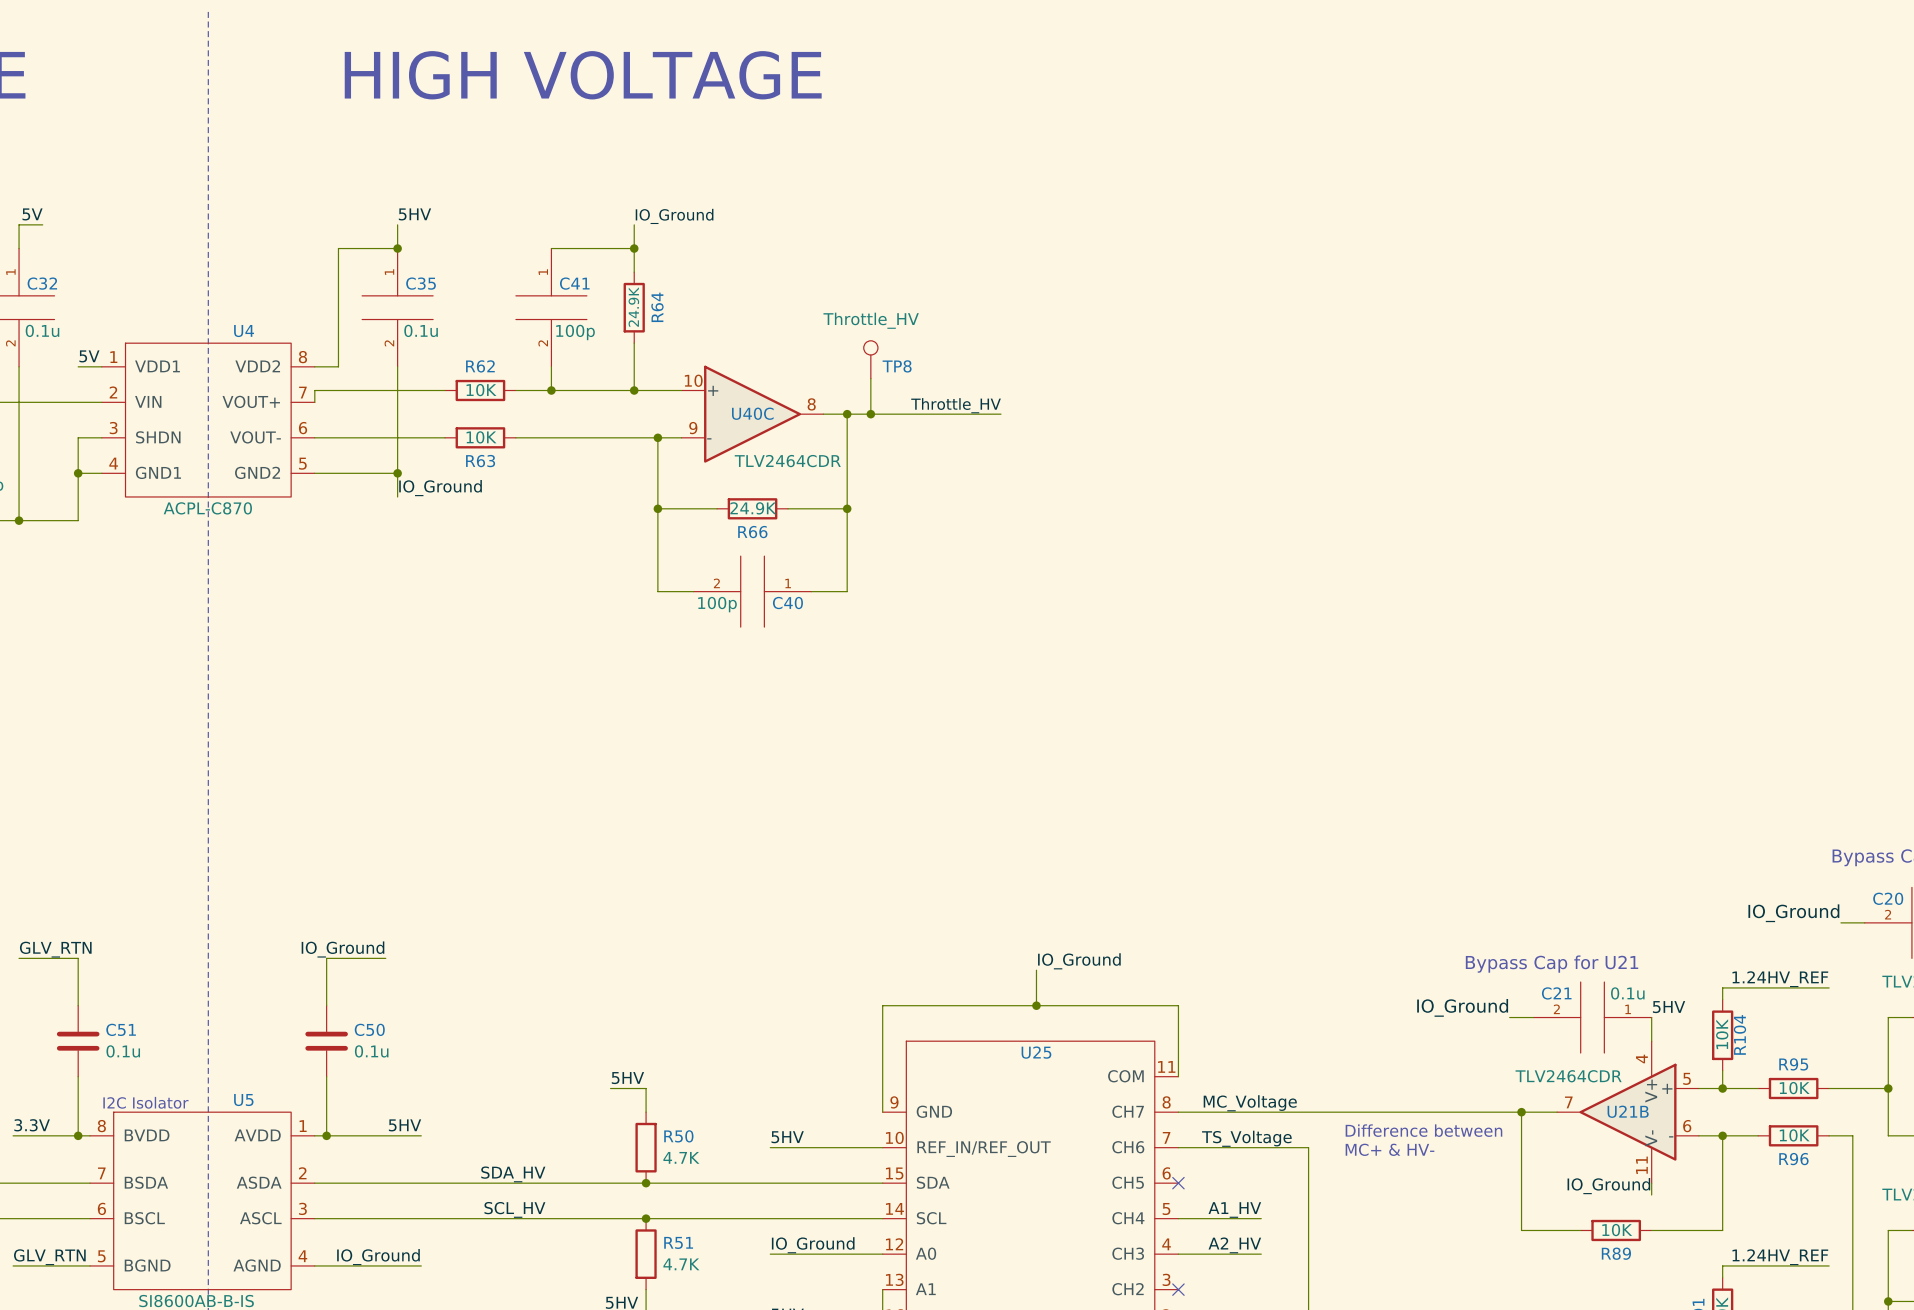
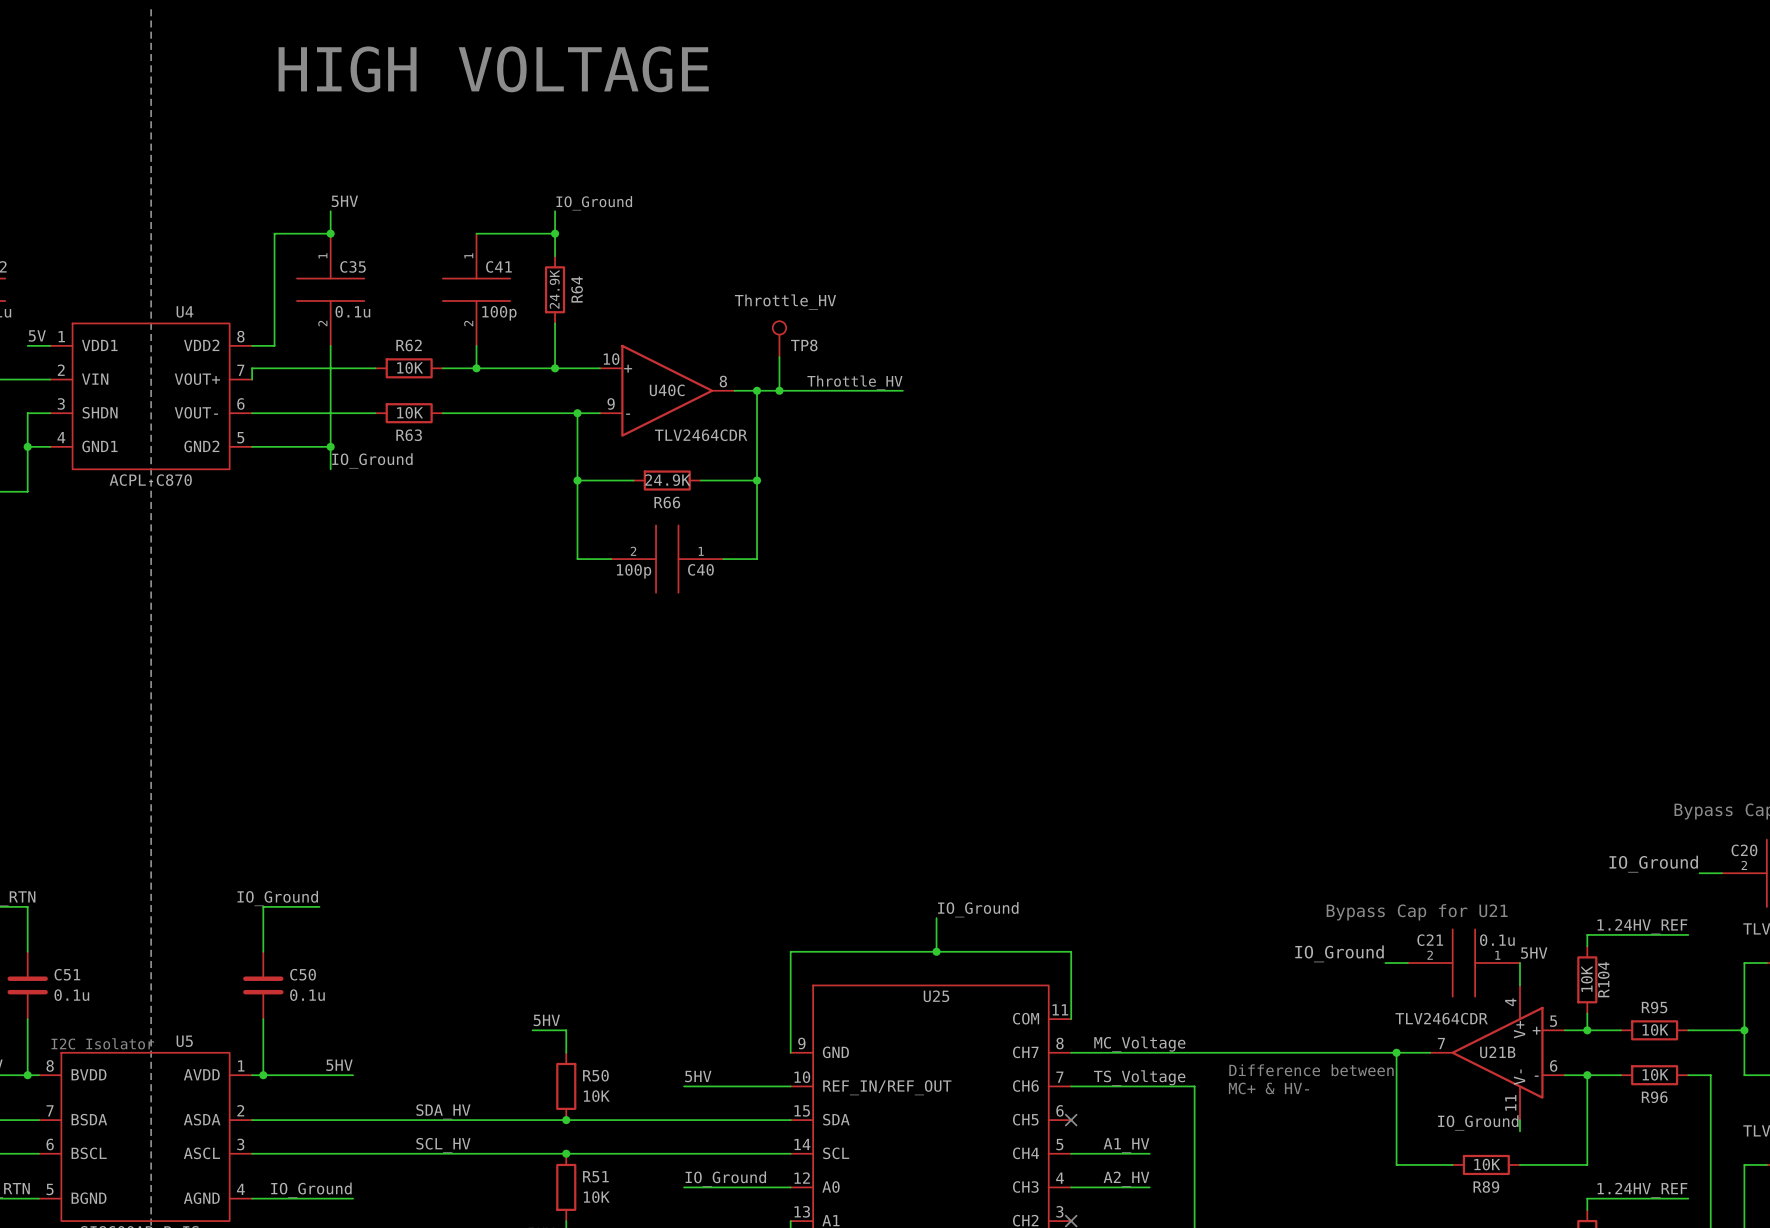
R50 value: 4.7K (681, 1157) -> 10K (596, 1096)
R51 value: 4.7K (681, 1264) -> 10K (596, 1197)

